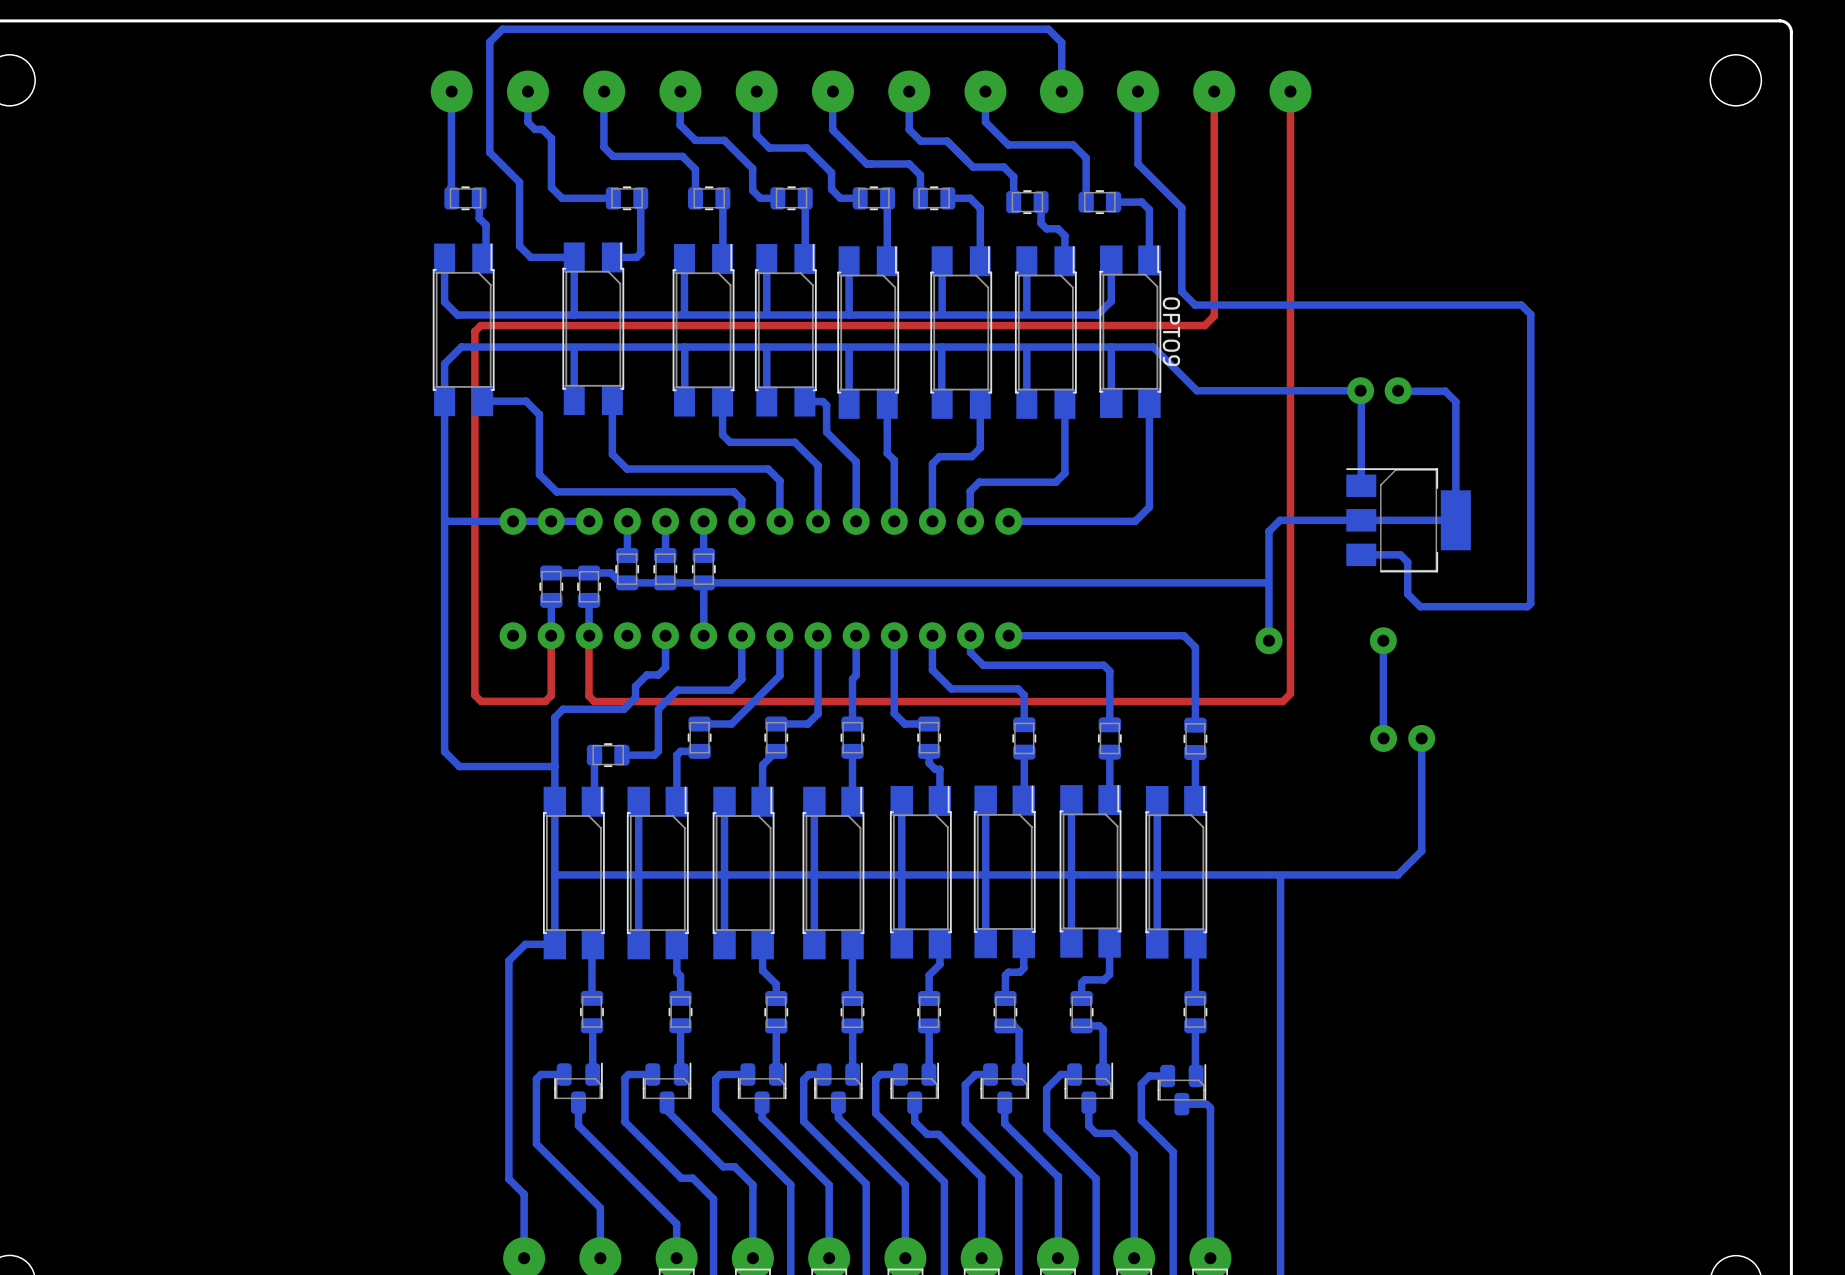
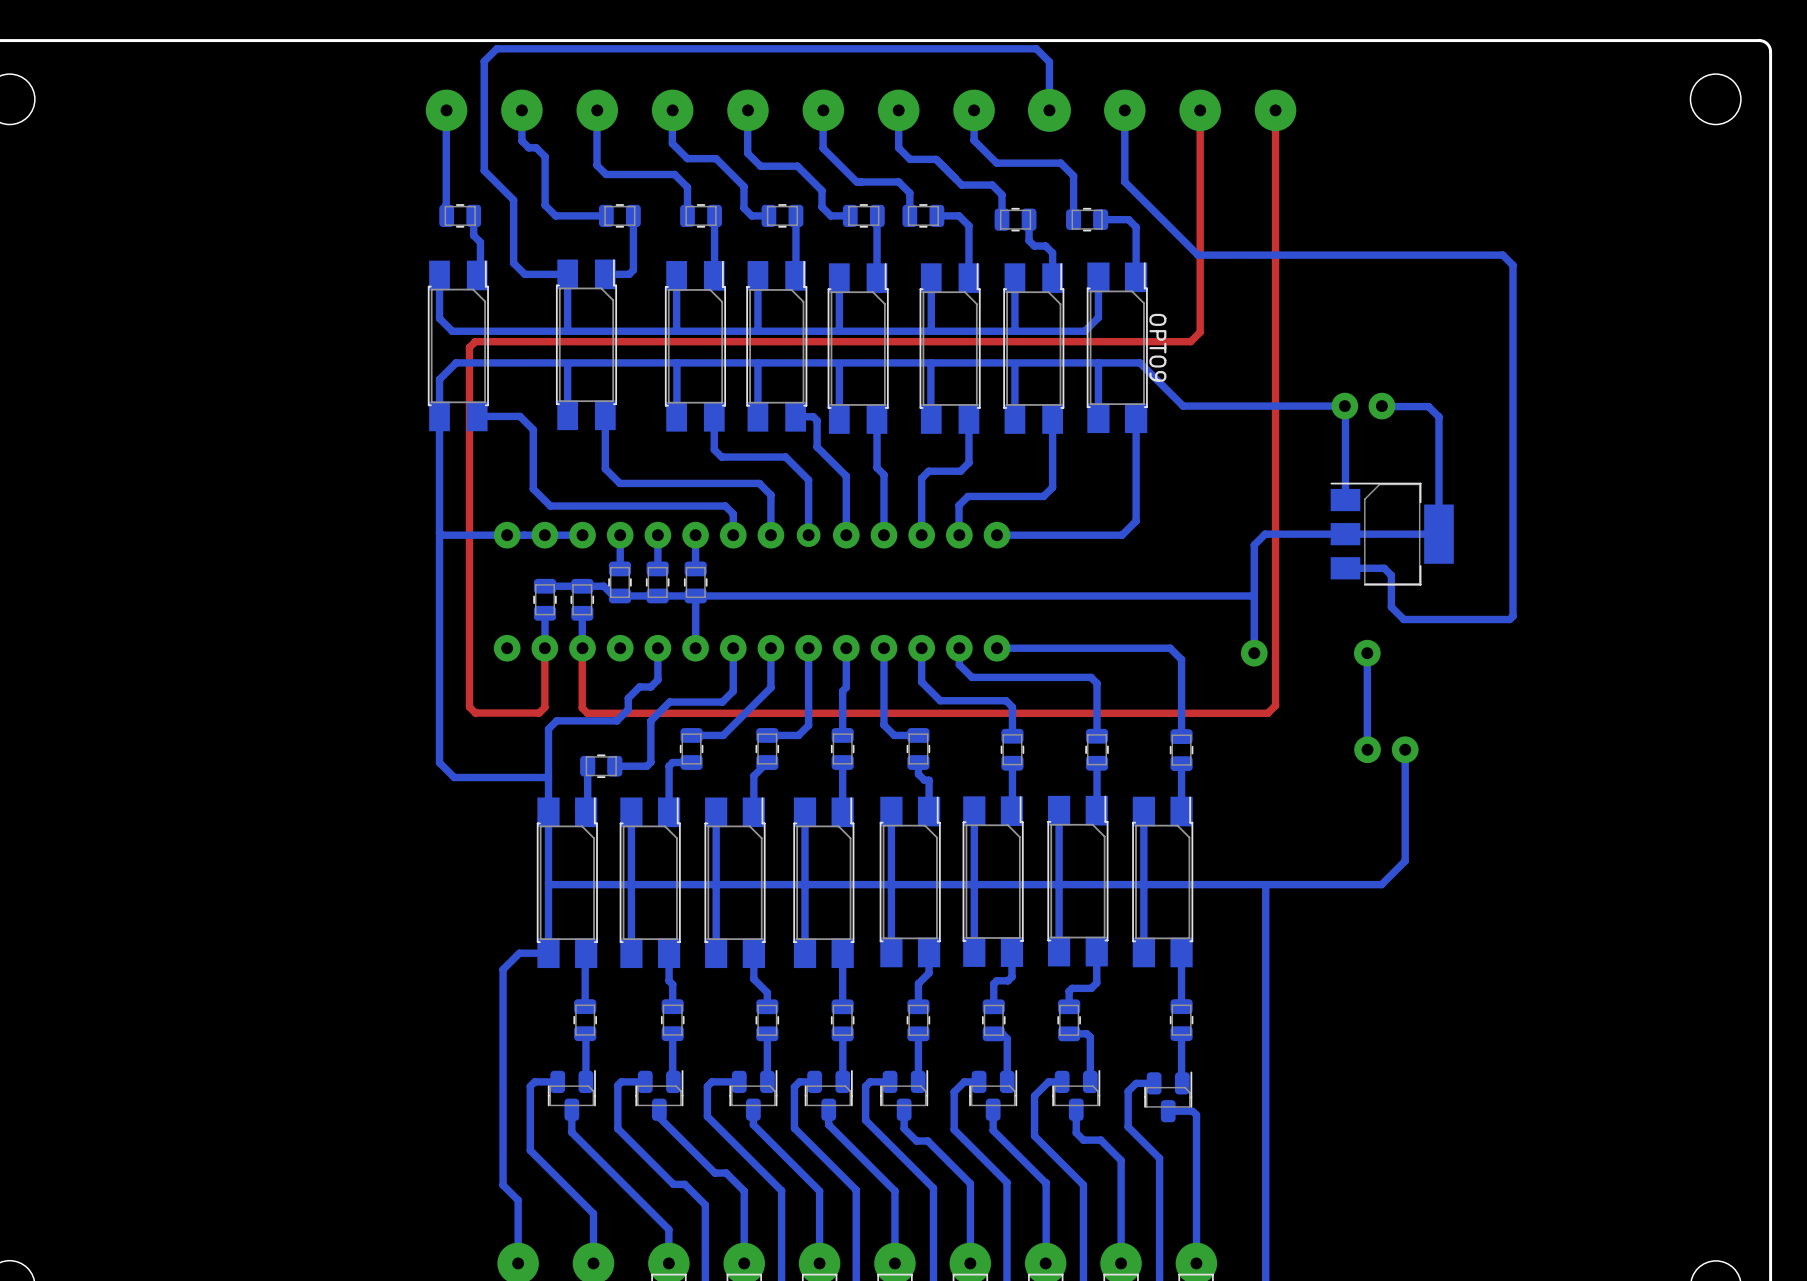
bottom track: (1181, 207) (1181, 291) (1195, 305) (1521, 305) (1530, 314) -> (1168, 225) (1197, 255) (1502, 255) (1513, 265) (1513, 330)

